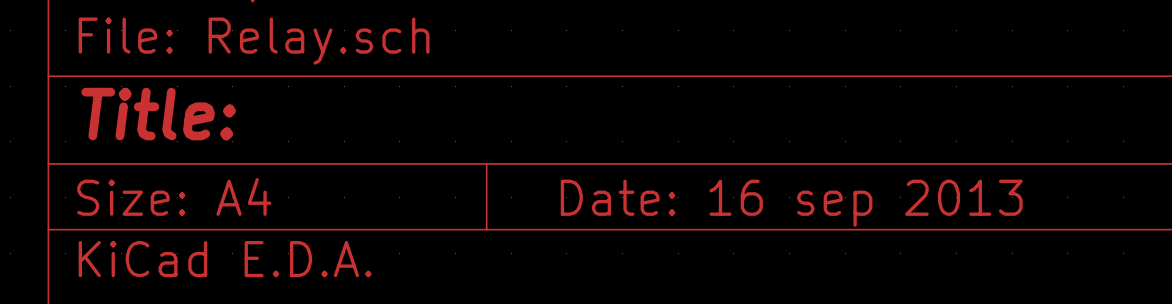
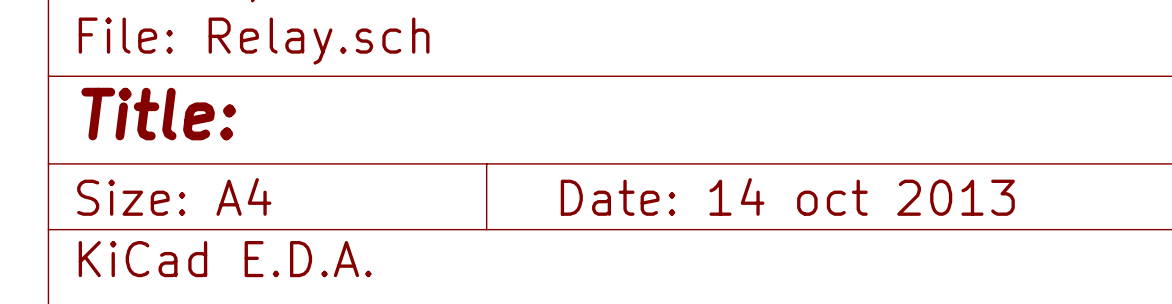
title block: Date: 16 sep 2013 (791, 203) -> Date: 14 oct 2013 (787, 196)

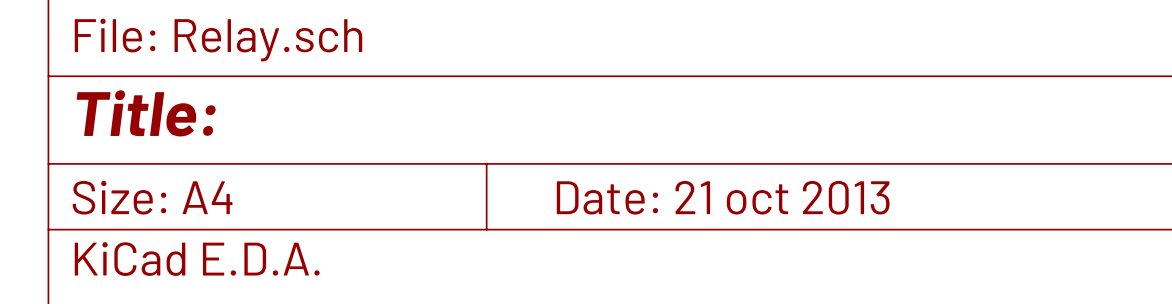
title block: Date: 14 oct 2013 (787, 196) -> Date: 21 oct 2013 (723, 197)

